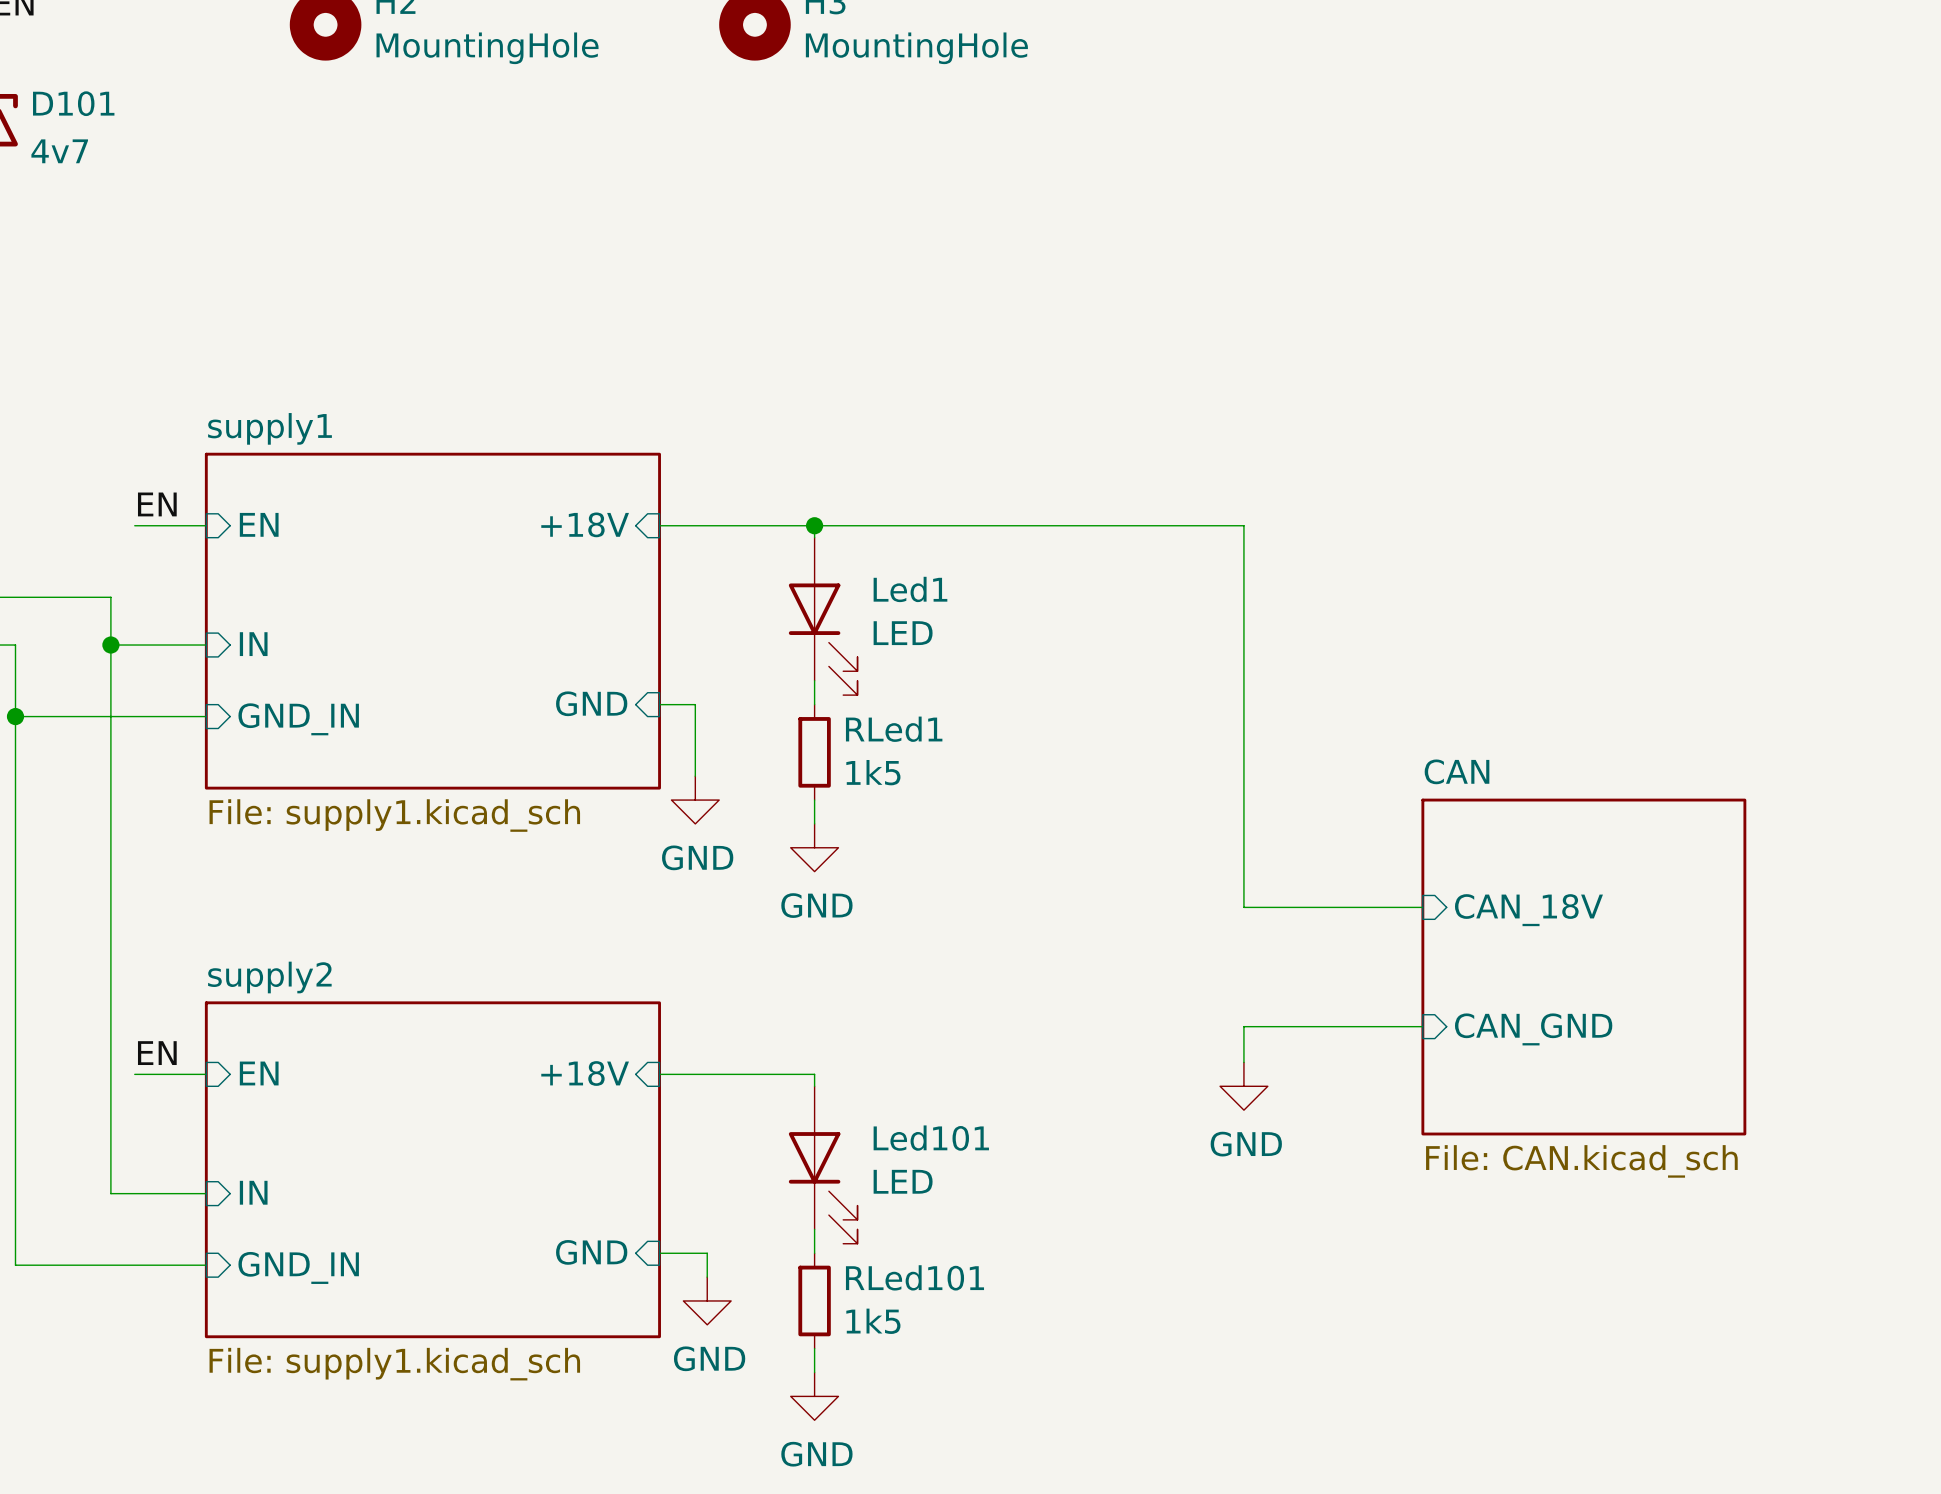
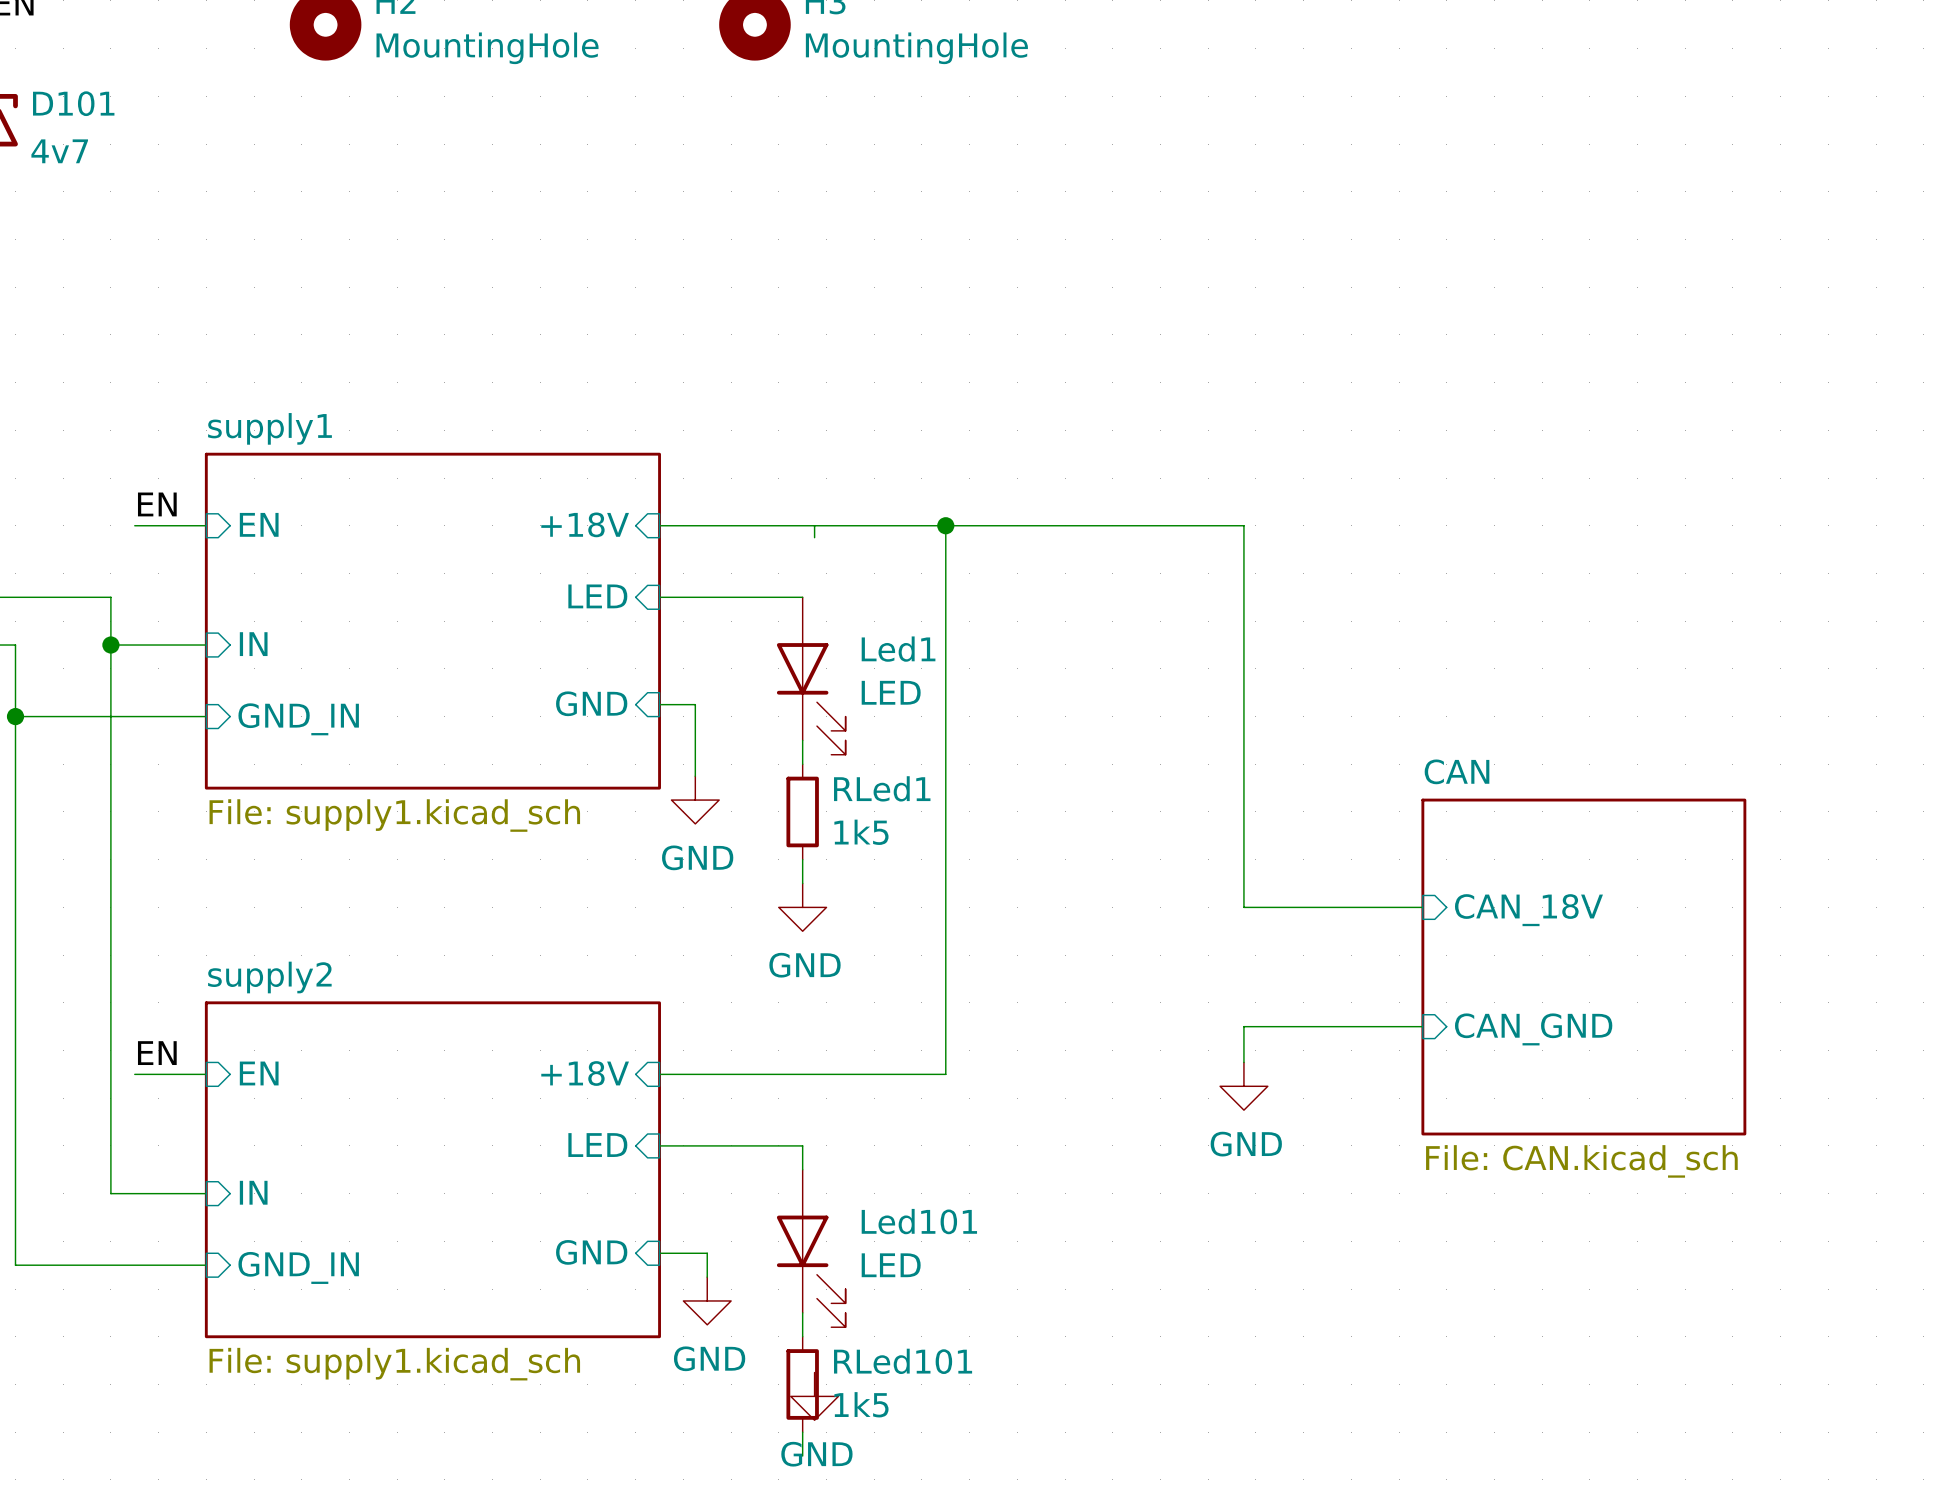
junction: (814, 525) -> none
junction: none -> (945, 525)
sheet pin: none -> LED (597, 596)
wire: none -> (659, 597) (802, 597)
Led1 position: (823, 616) -> (811, 676)
wire: (814, 680) (814, 704) -> (802, 740) (802, 764)
RLed1 position: (814, 752) -> (802, 811)
wire: (814, 800) (814, 823) -> (802, 859) (802, 883)
power symbol position: GND (814, 847) -> GND (802, 907)
wire: (814, 1074) (814, 1086) -> (814, 1074) (945, 1074) (945, 525)
sheet pin: none -> LED (597, 1145)
wire: none -> (659, 1145) (802, 1145) (802, 1169)
Led101 position: (823, 1165) -> (811, 1248)
wire: (814, 1229) (814, 1253) -> (802, 1312) (802, 1336)
RLed101 position: (814, 1300) -> (802, 1384)
wire: (814, 1348) (814, 1372) -> (802, 1432) (802, 1456)

